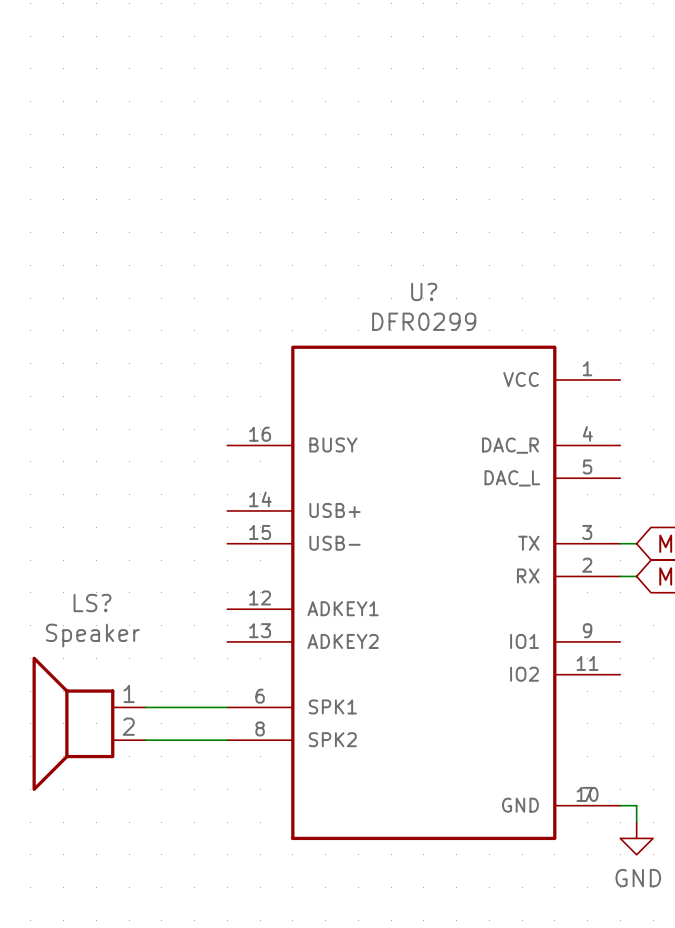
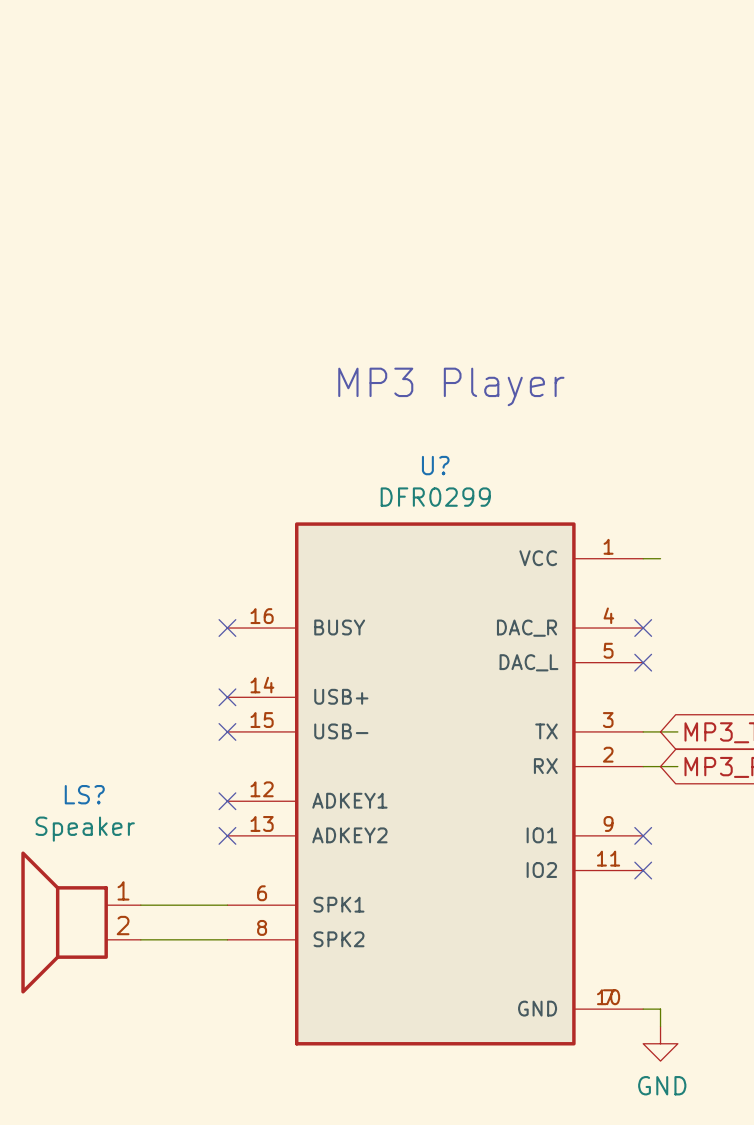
text: none -> MP3 Player (451, 386)
wire: none -> (643, 558) (660, 558)
no-connect mark: none -> (227, 628)
no-connect mark: none -> (643, 628)
no-connect mark: none -> (643, 662)
no-connect mark: none -> (227, 697)
no-connect mark: none -> (227, 731)
wire: none -> (660, 731) (677, 731)
wire: none -> (660, 766) (677, 766)
no-connect mark: none -> (227, 801)
no-connect mark: none -> (227, 835)
no-connect mark: none -> (643, 835)
no-connect mark: none -> (643, 870)

